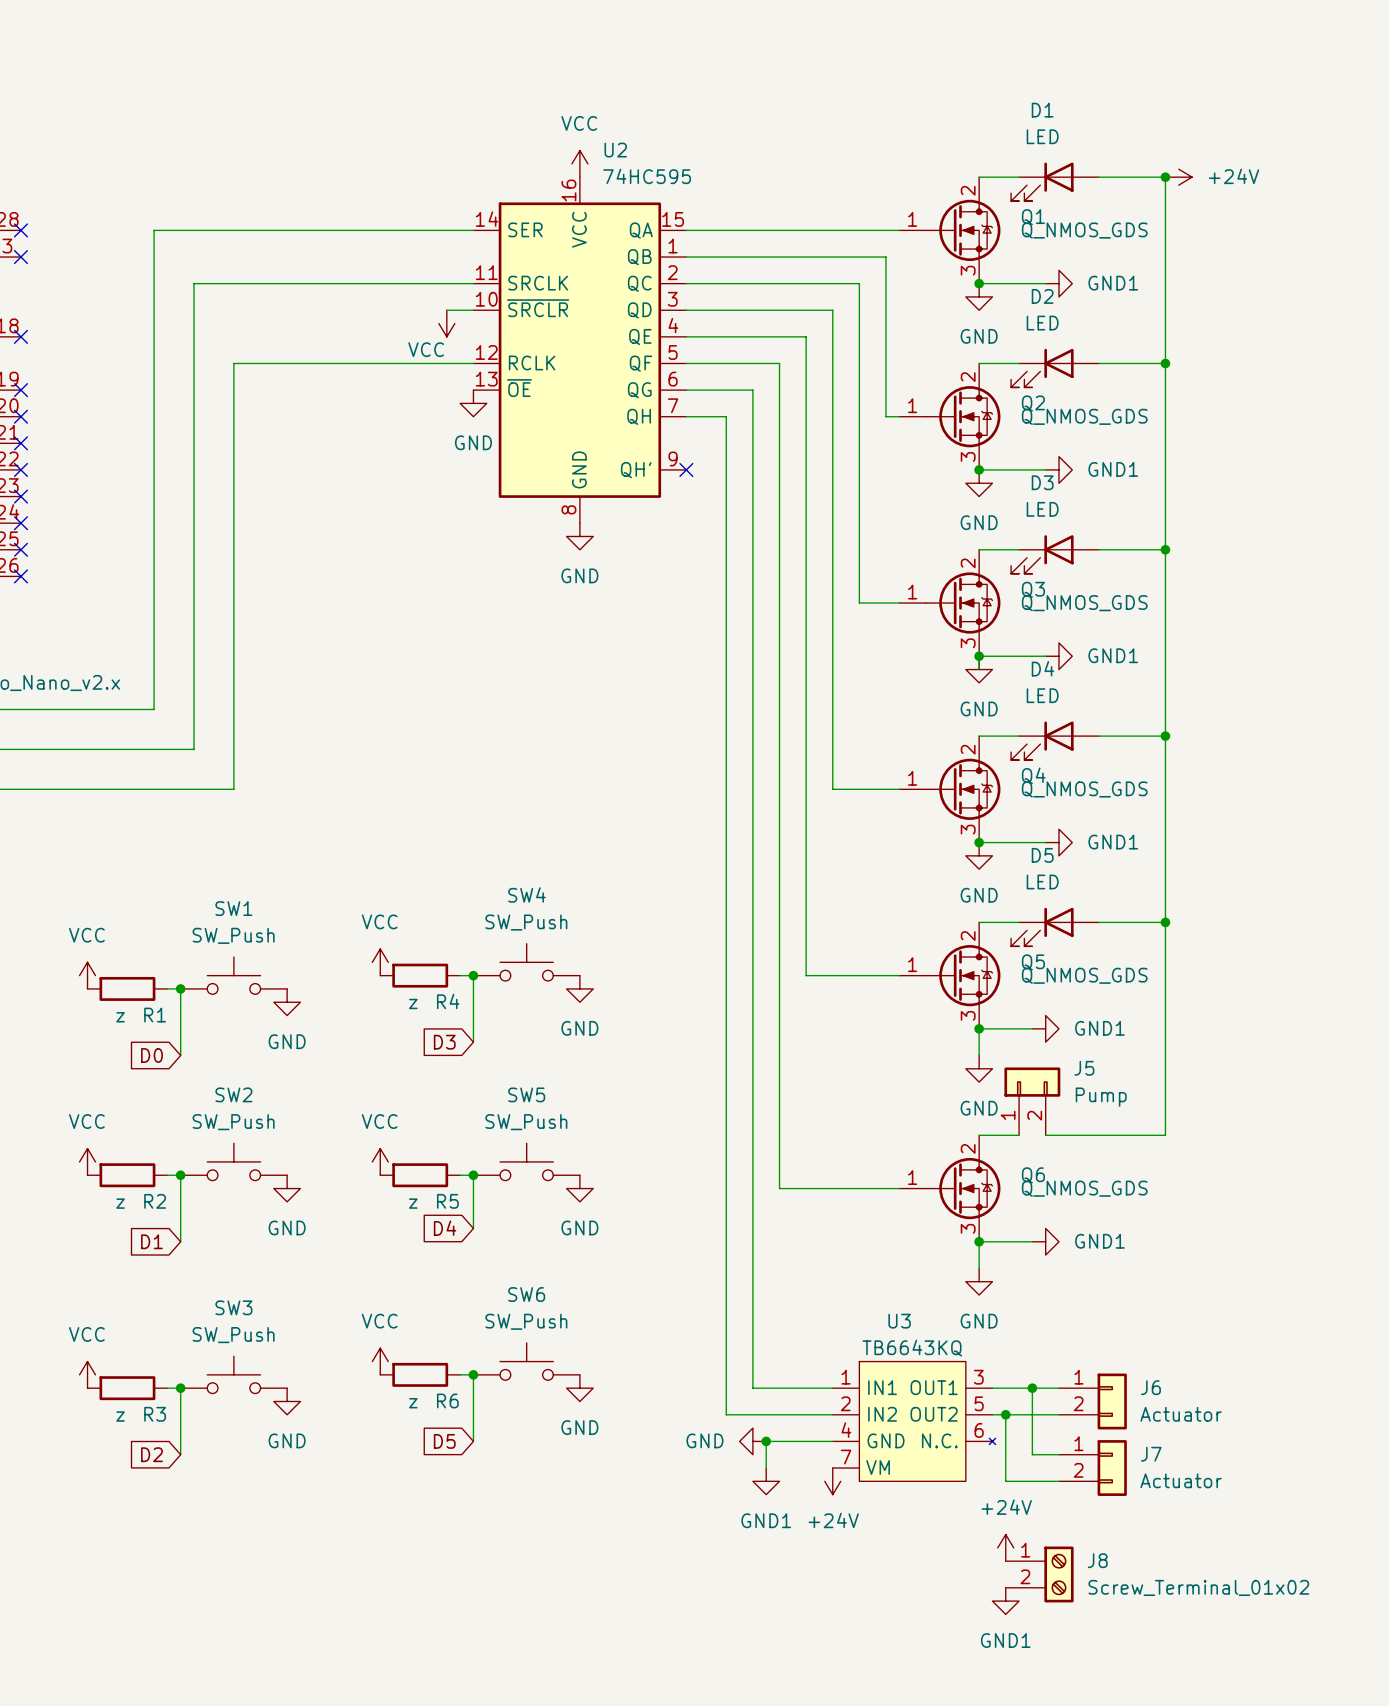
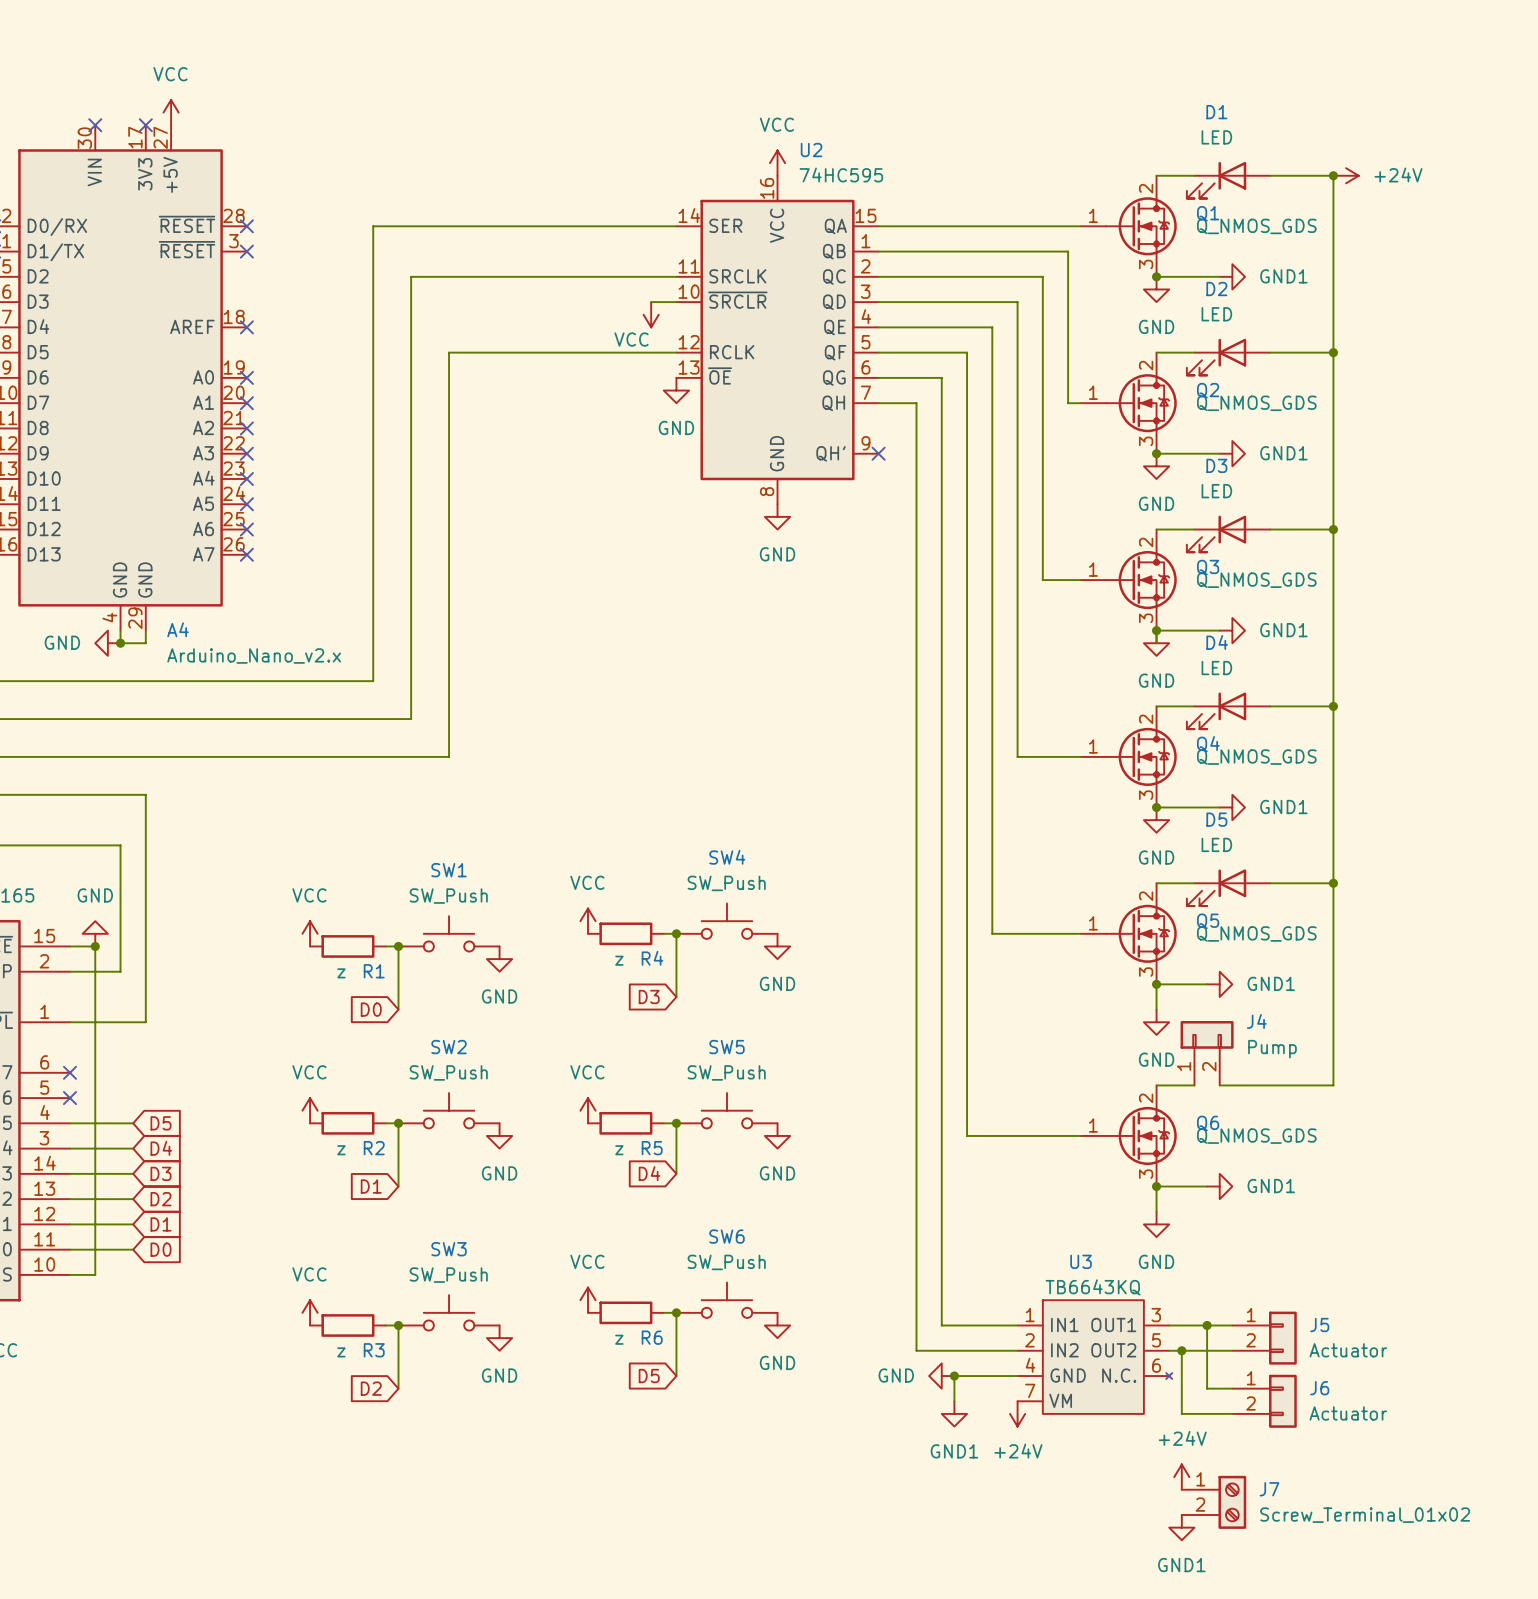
J5 name: J5 (1084, 1068) -> J4 (1256, 1021)
J6 name: J6 (1150, 1387) -> J5 (1319, 1325)
J7 name: J7 (1151, 1454) -> J6 (1319, 1388)
J8 name: J8 (1097, 1560) -> J7 (1269, 1489)

